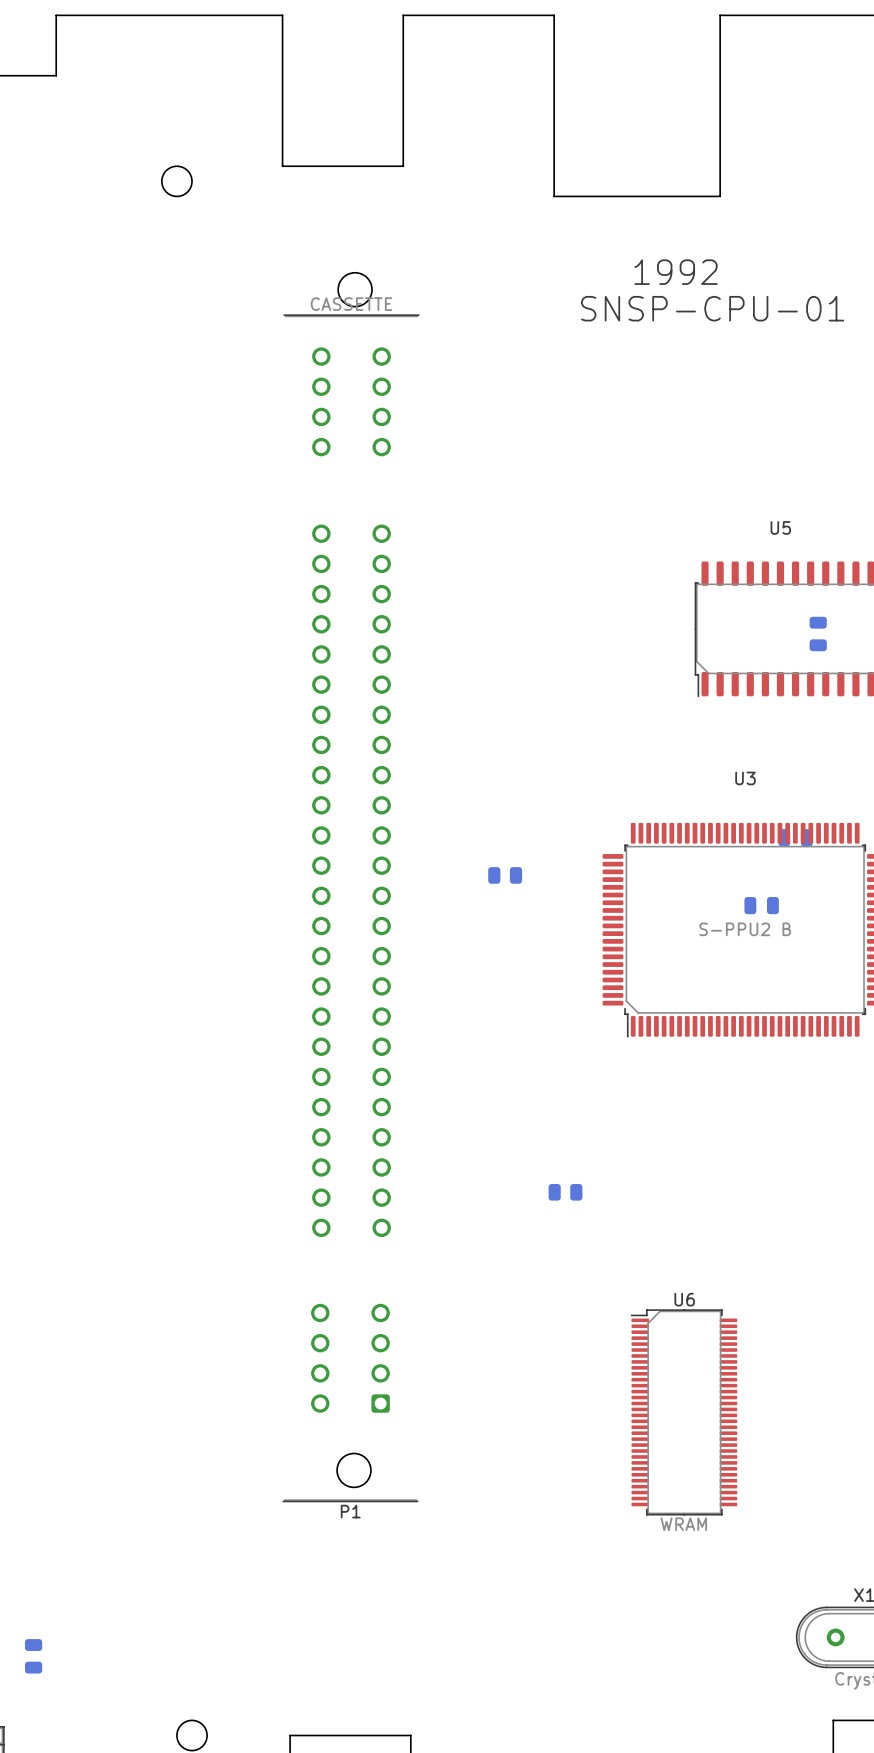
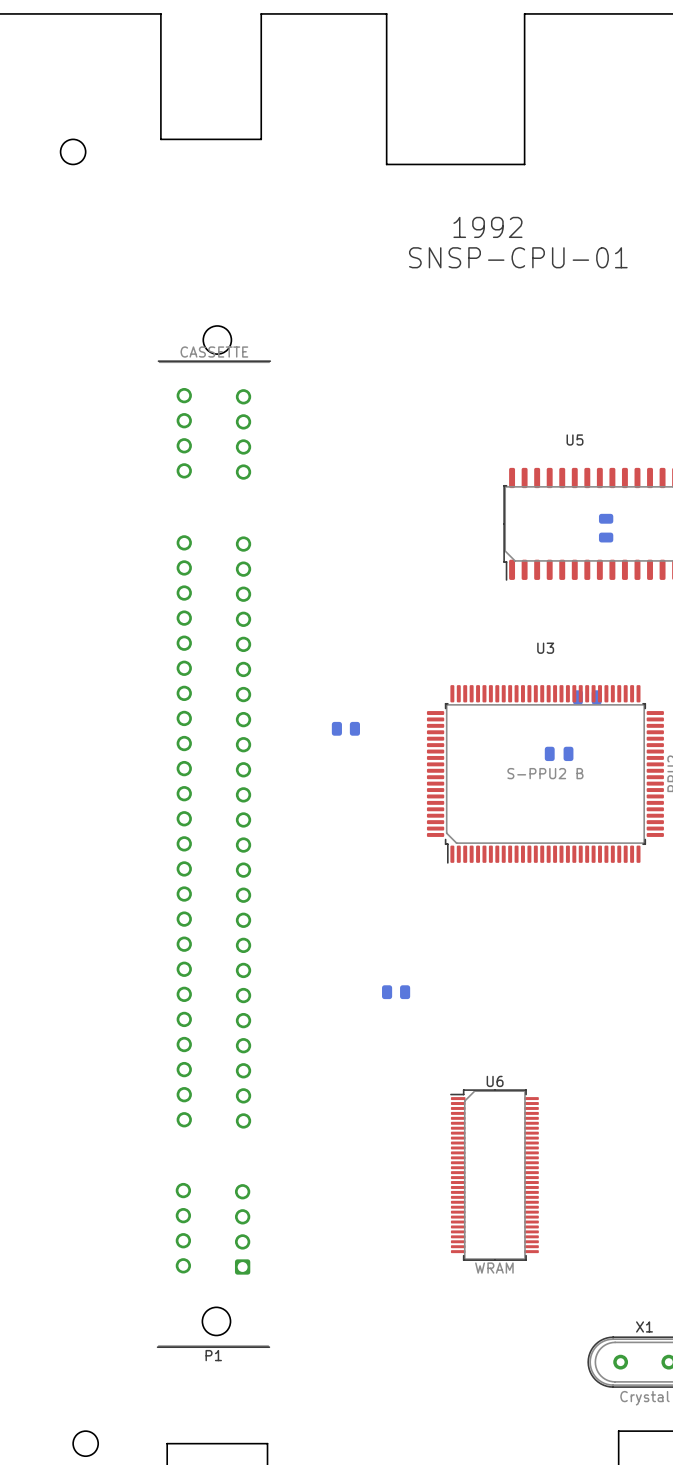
P1 footprint: [282, 272, 420, 1503] -> [157, 325, 271, 1348]

